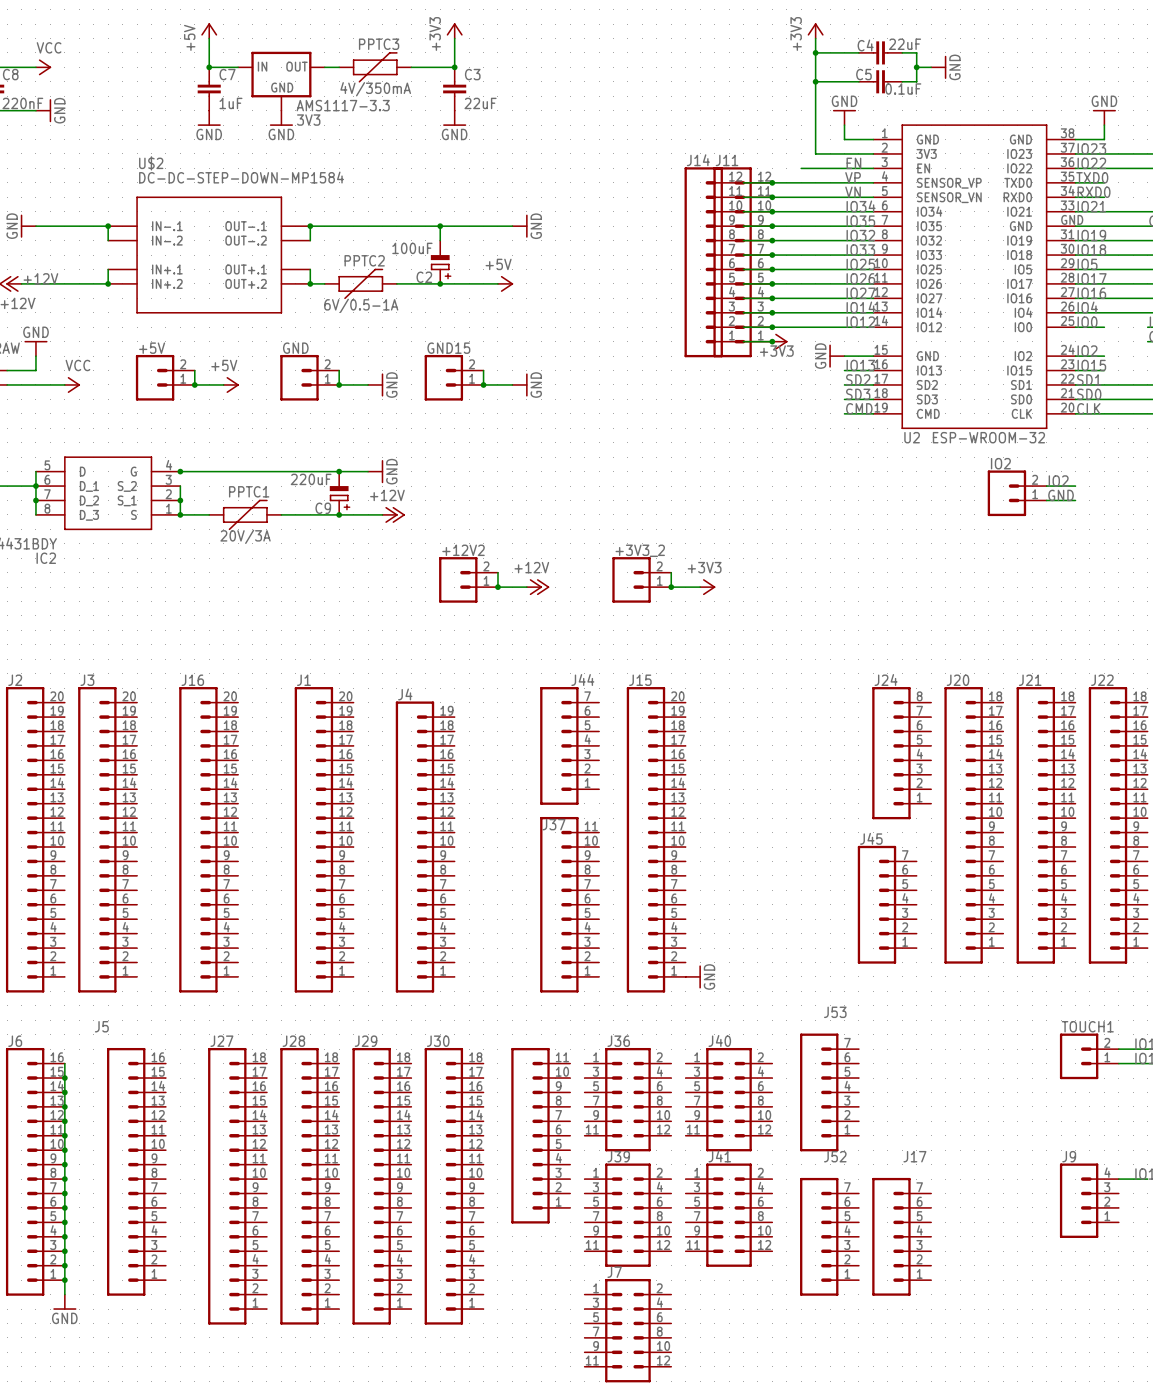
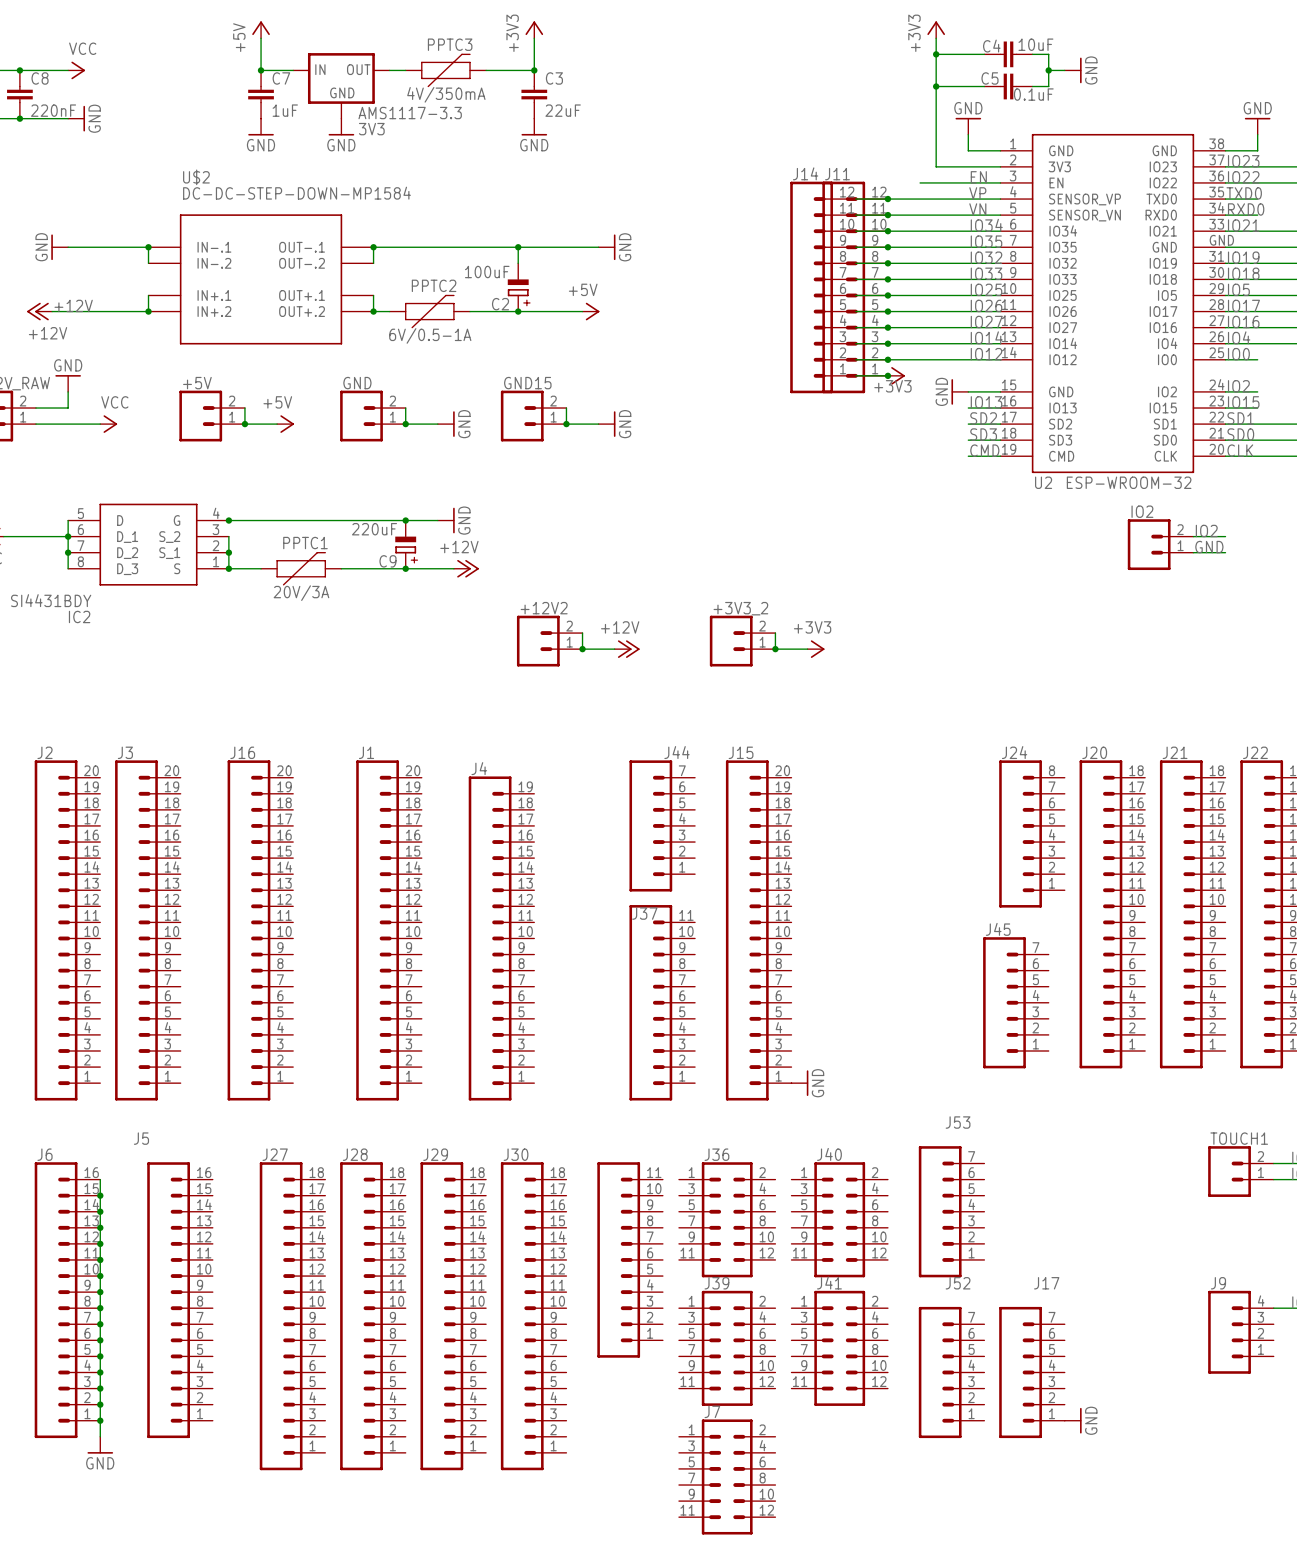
C4 value: 22uF (905, 44) -> 10uF (1035, 44)
power symbol: none -> GND (1073, 1420)

